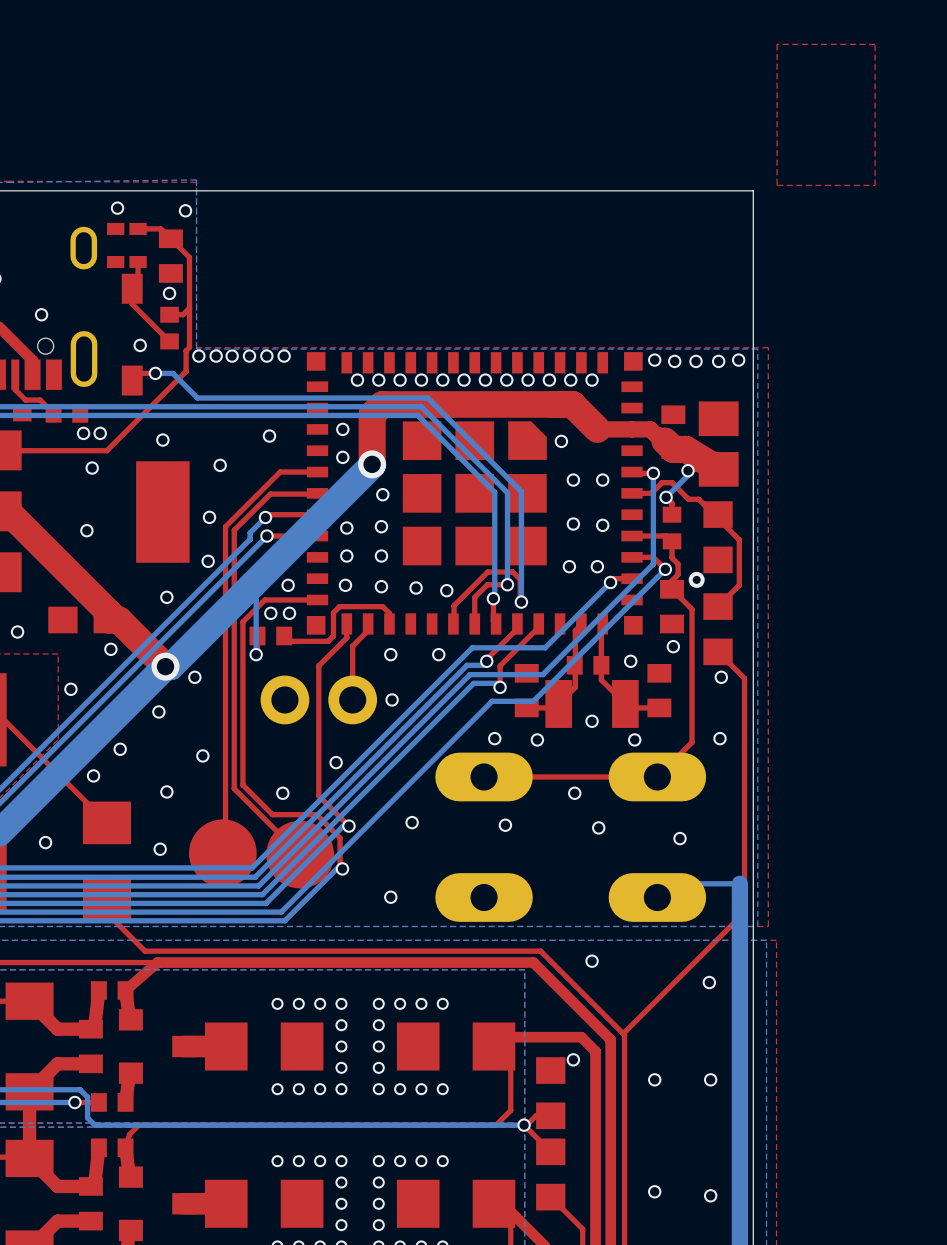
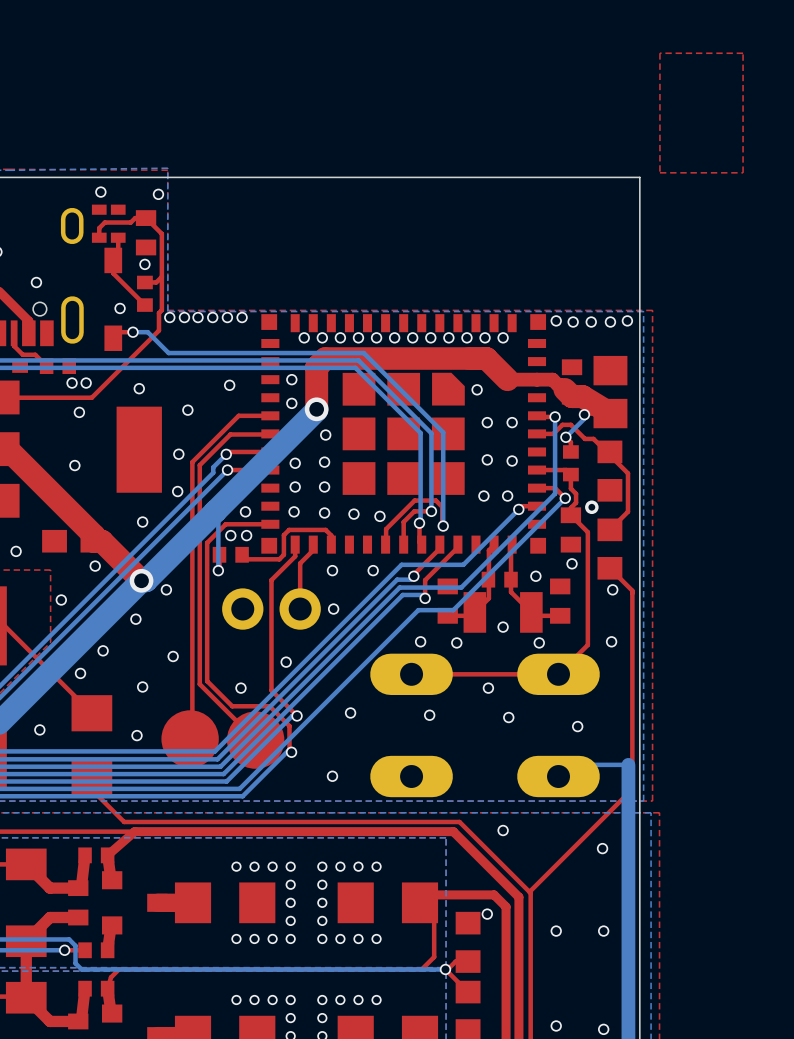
top track: (138, 228) (160, 228) (170, 238) -> (99, 237) (99, 228) (104, 222) (130, 222) (135, 218) (146, 218)

